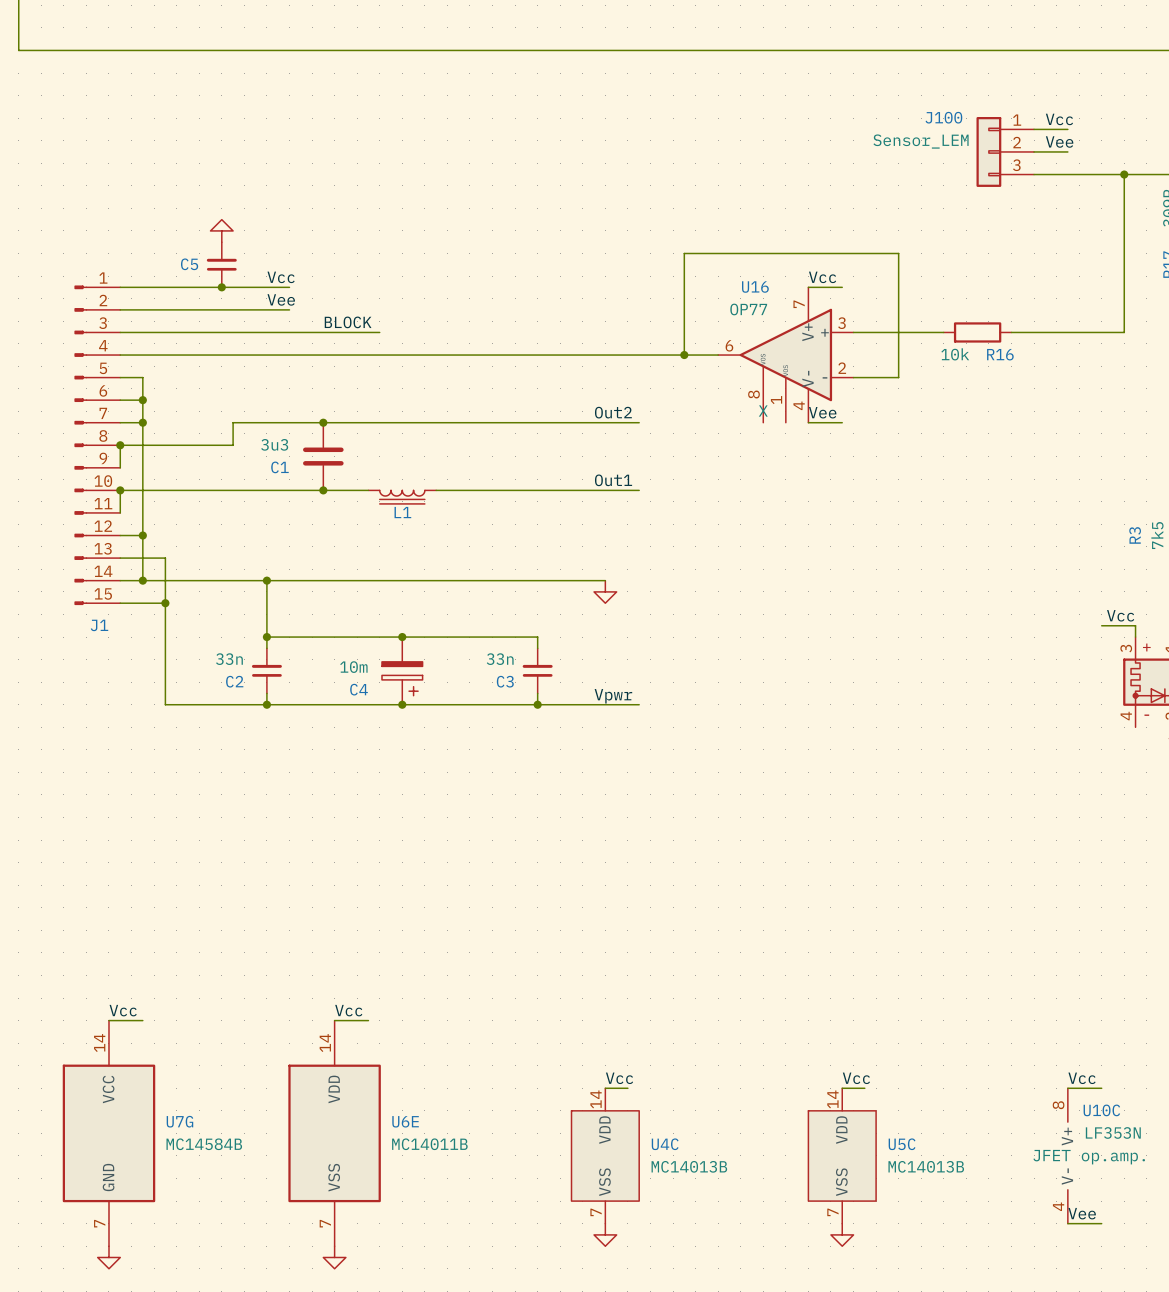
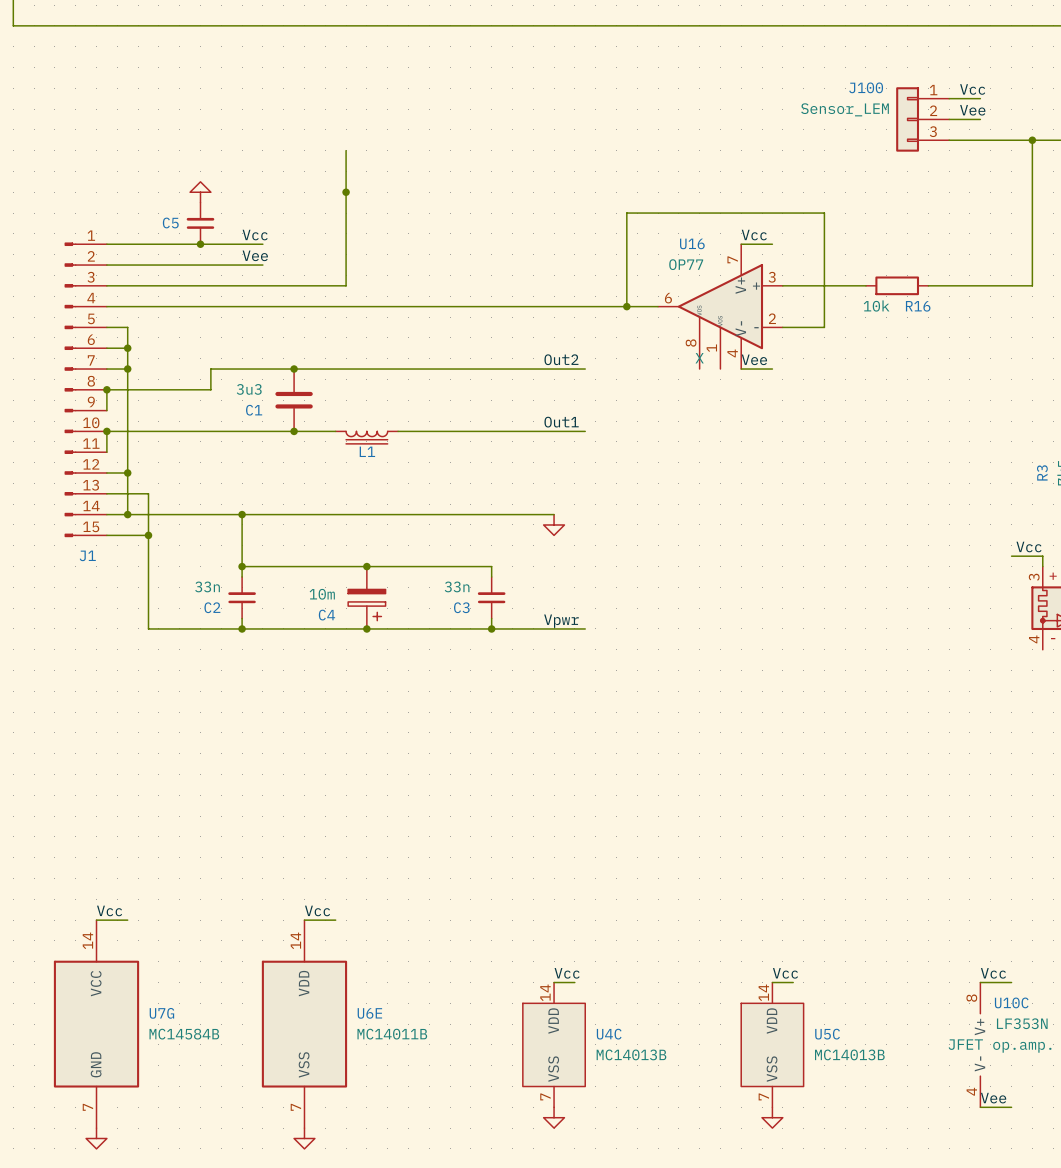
wire: none -> (346, 150) (346, 285)
junction: none -> (346, 192)
label: BLOCK (348, 322) -> none

